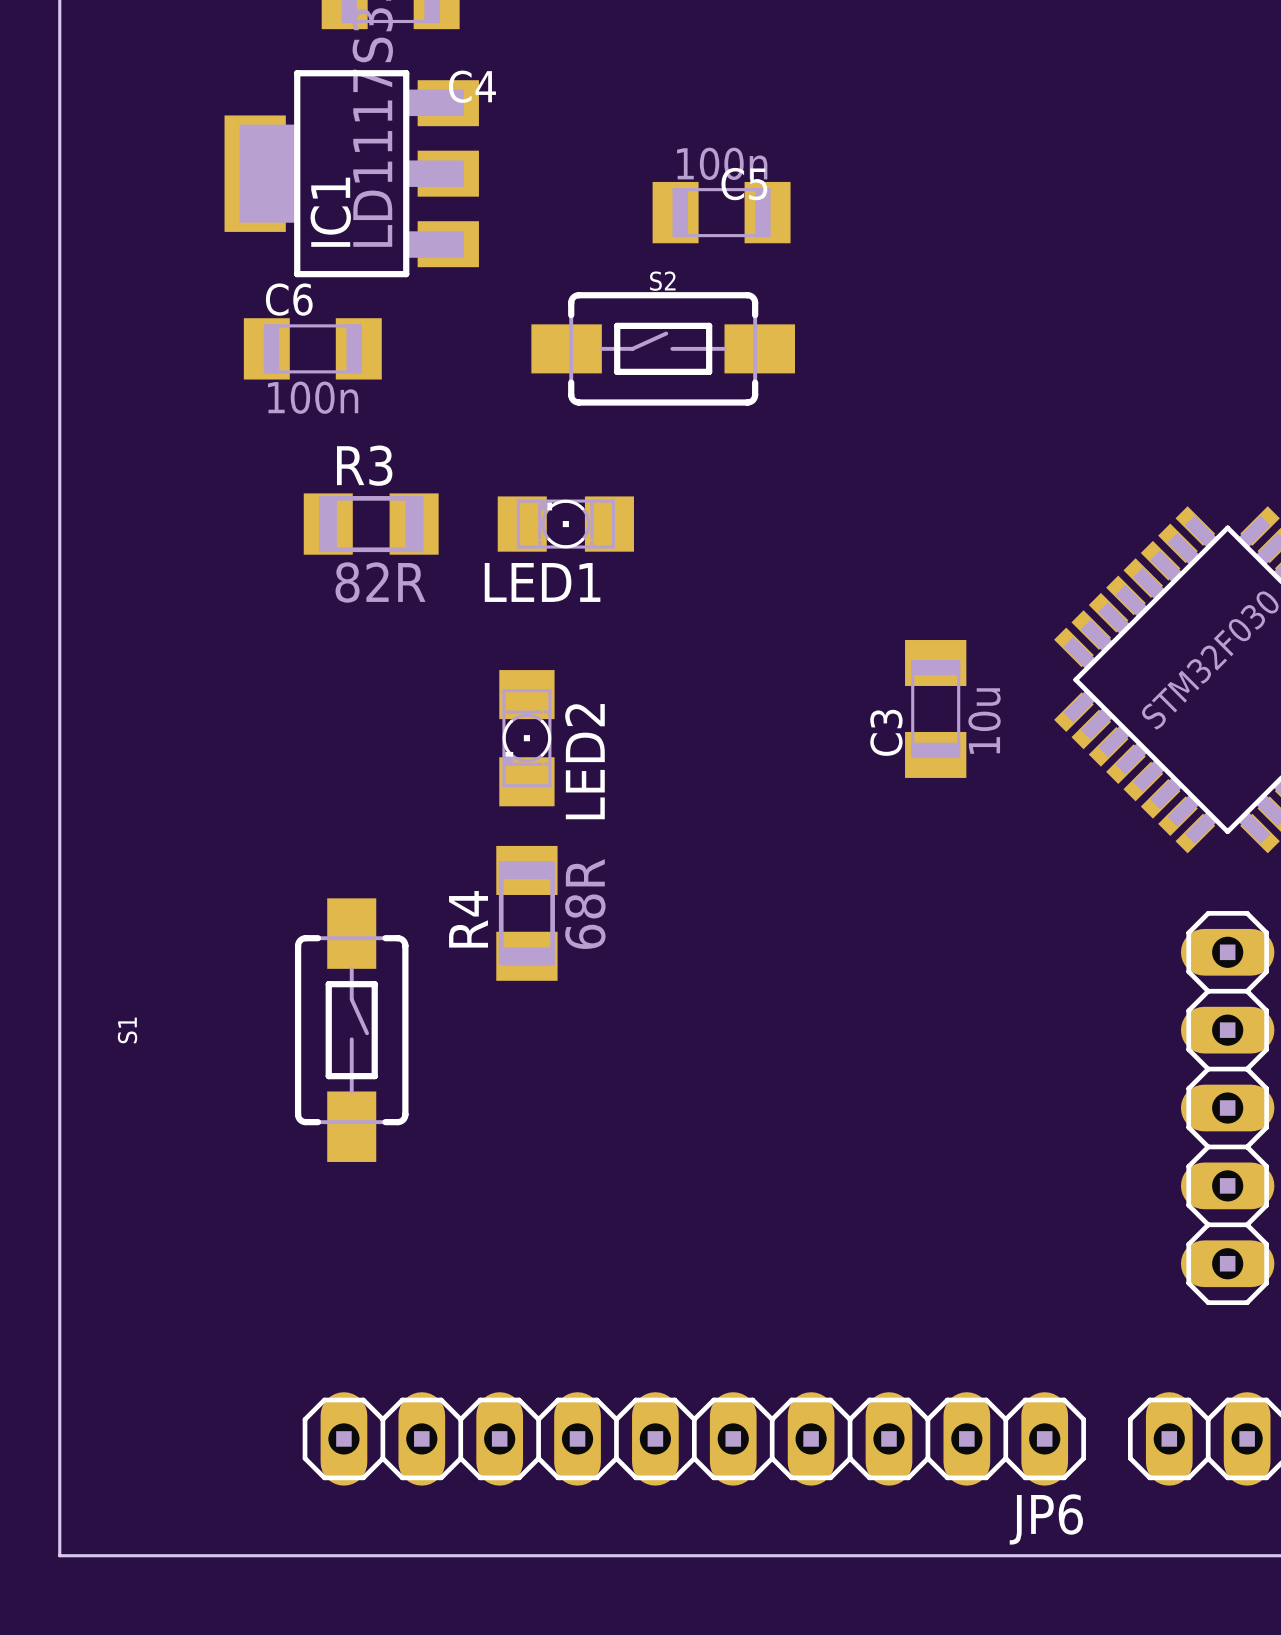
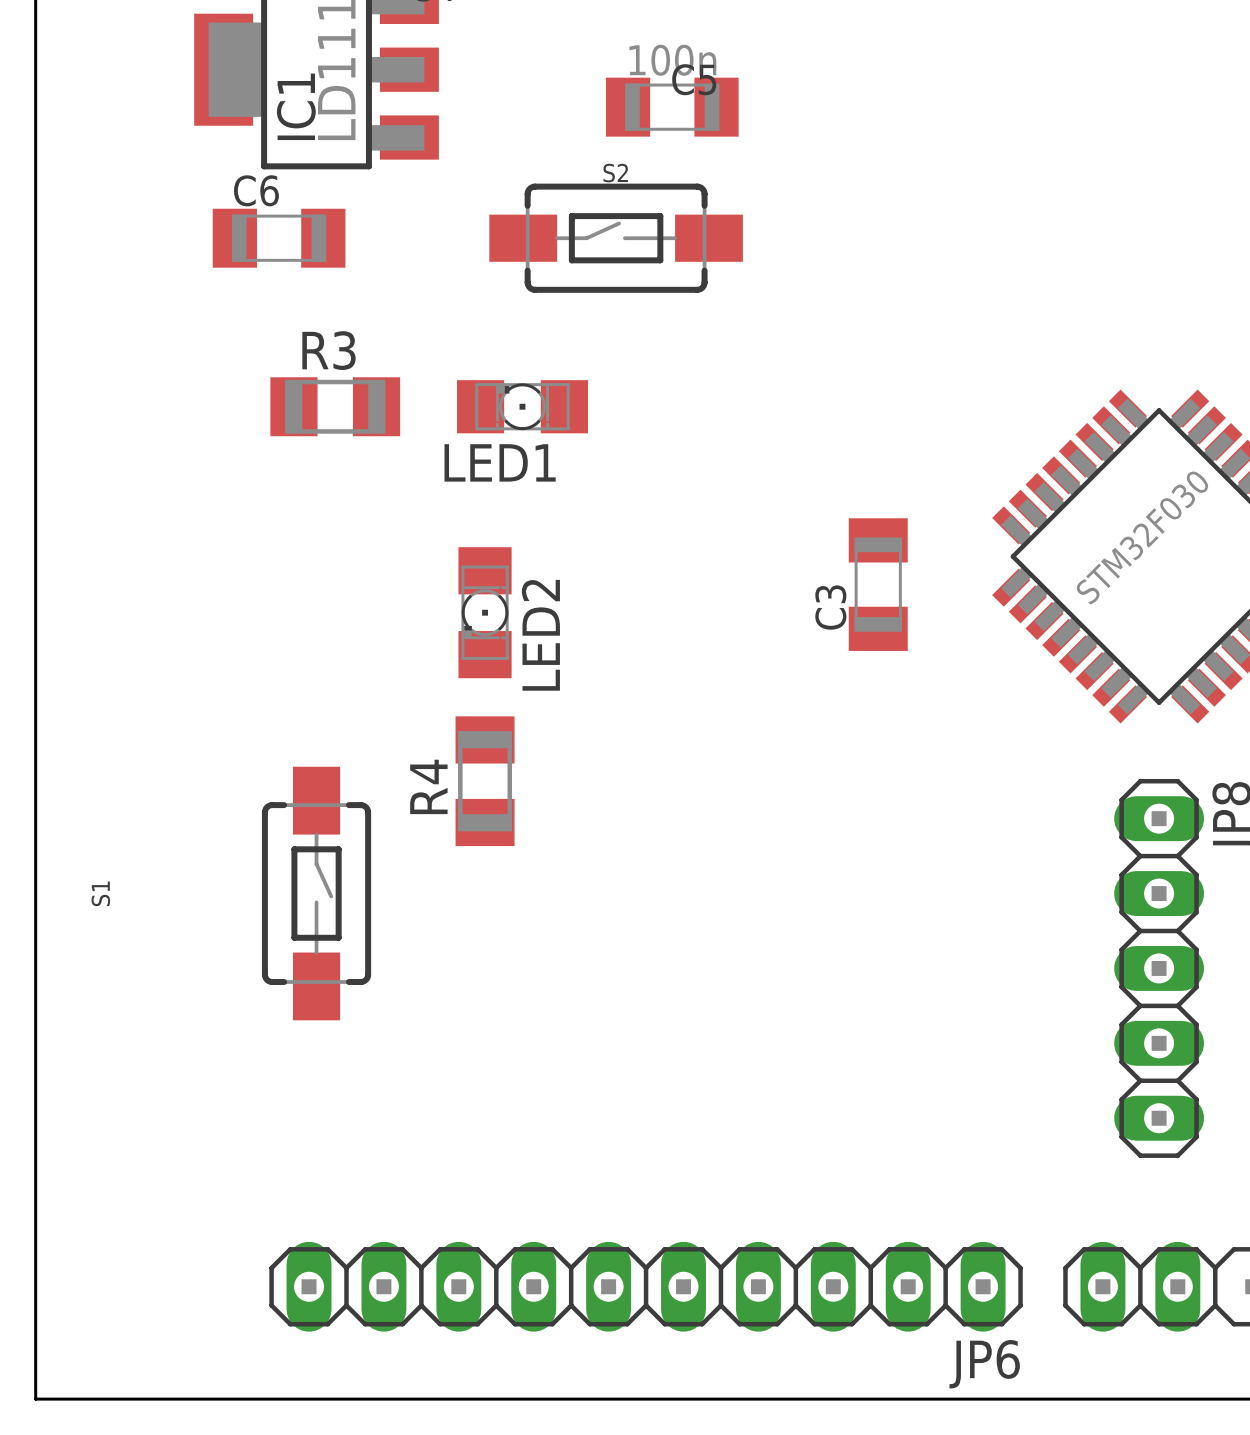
C6 value: 100n (313, 397) -> none
R3 value: 82R (380, 582) -> none
C3 value: 10u (984, 721) -> none
R4 value: 68R (585, 904) -> none

